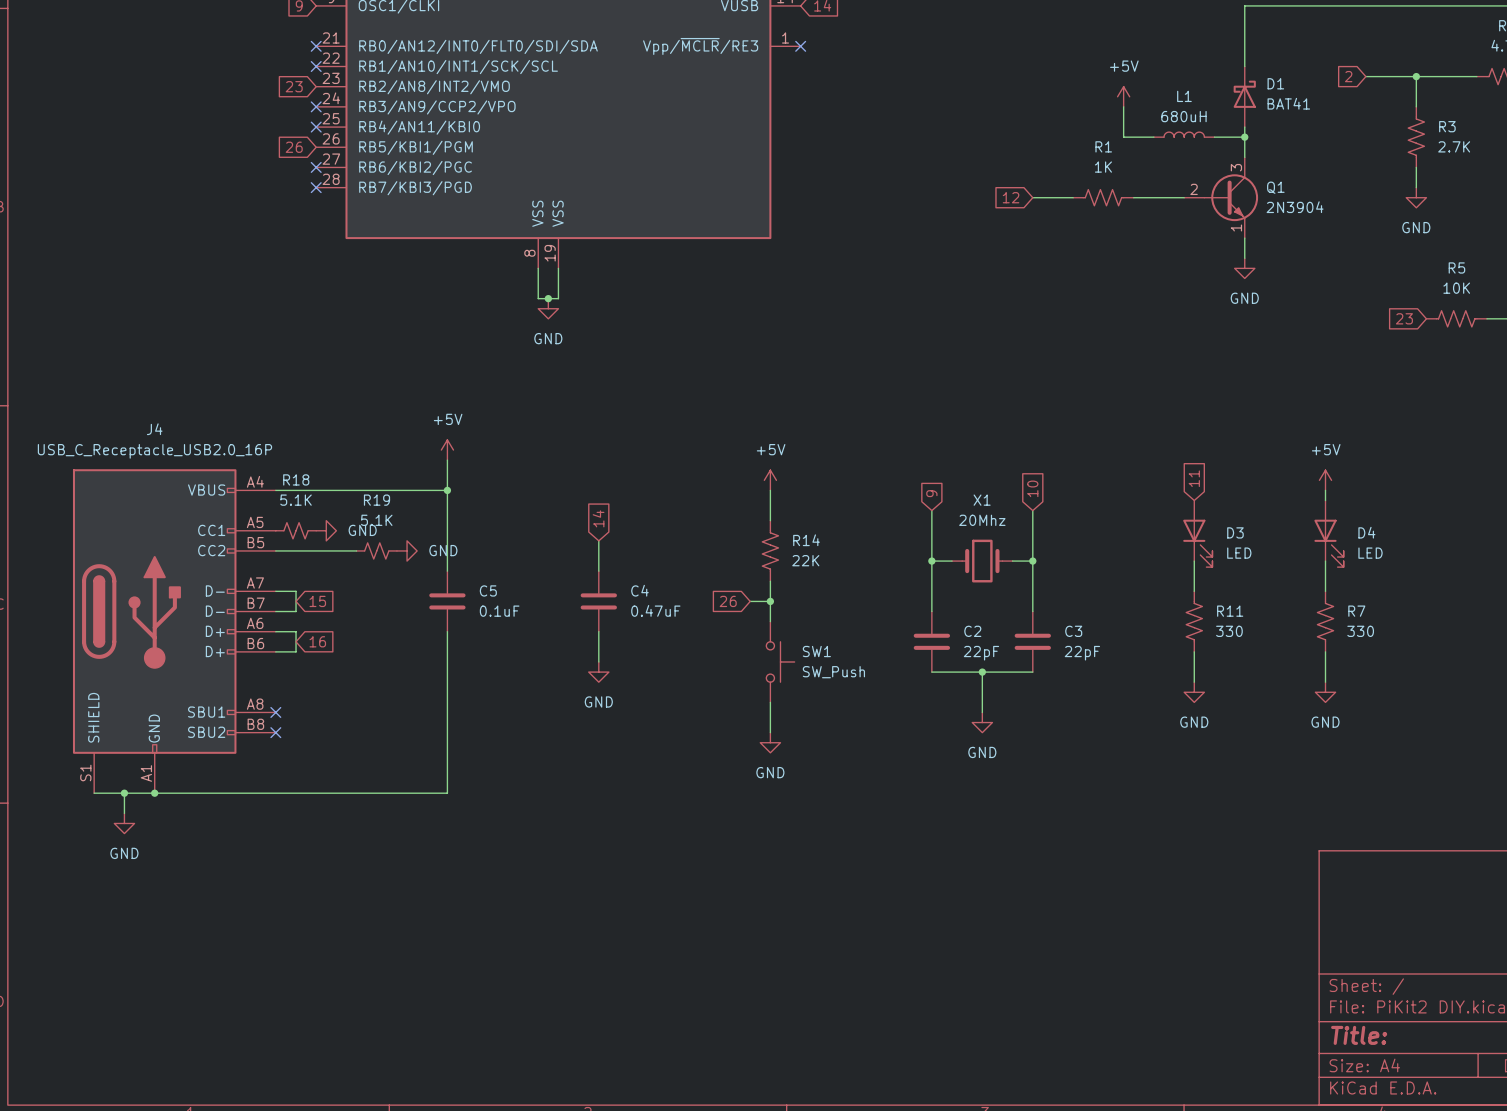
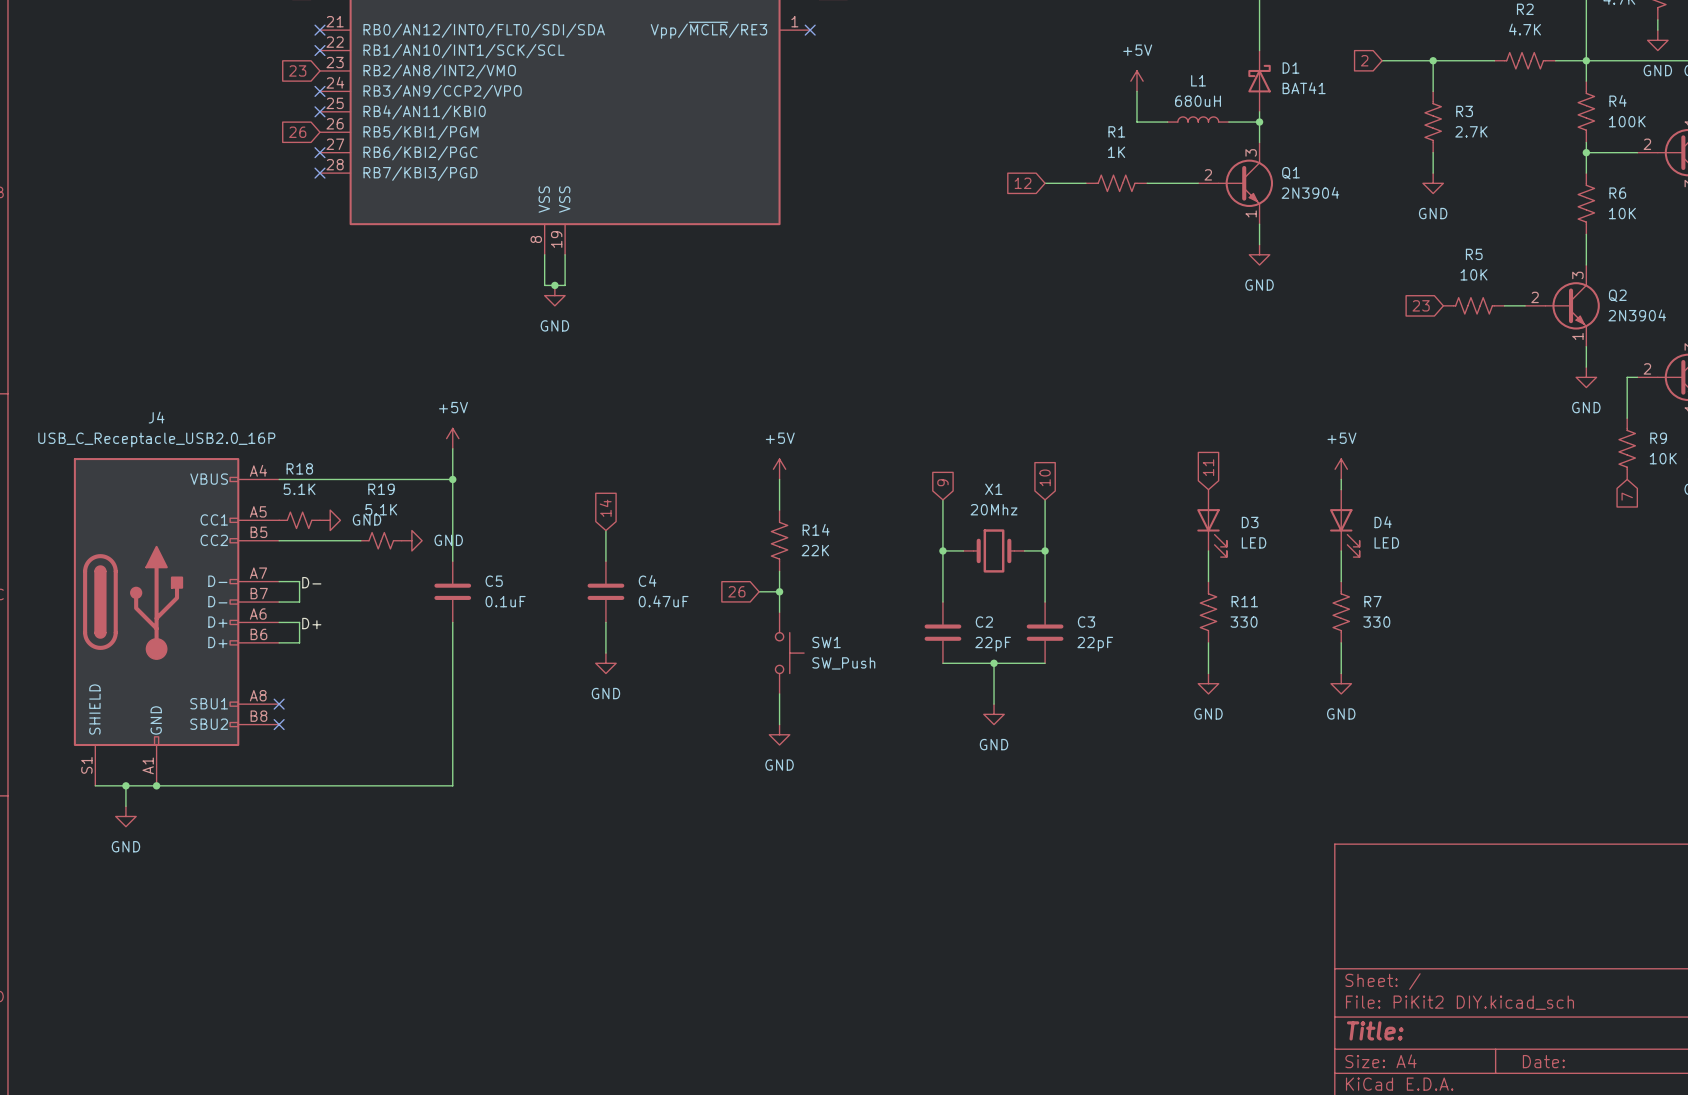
label: none -> D- (311, 582)
global label: 15 (317, 601) -> none
label: none -> D+ (311, 623)
global label: 16 (317, 641) -> none

